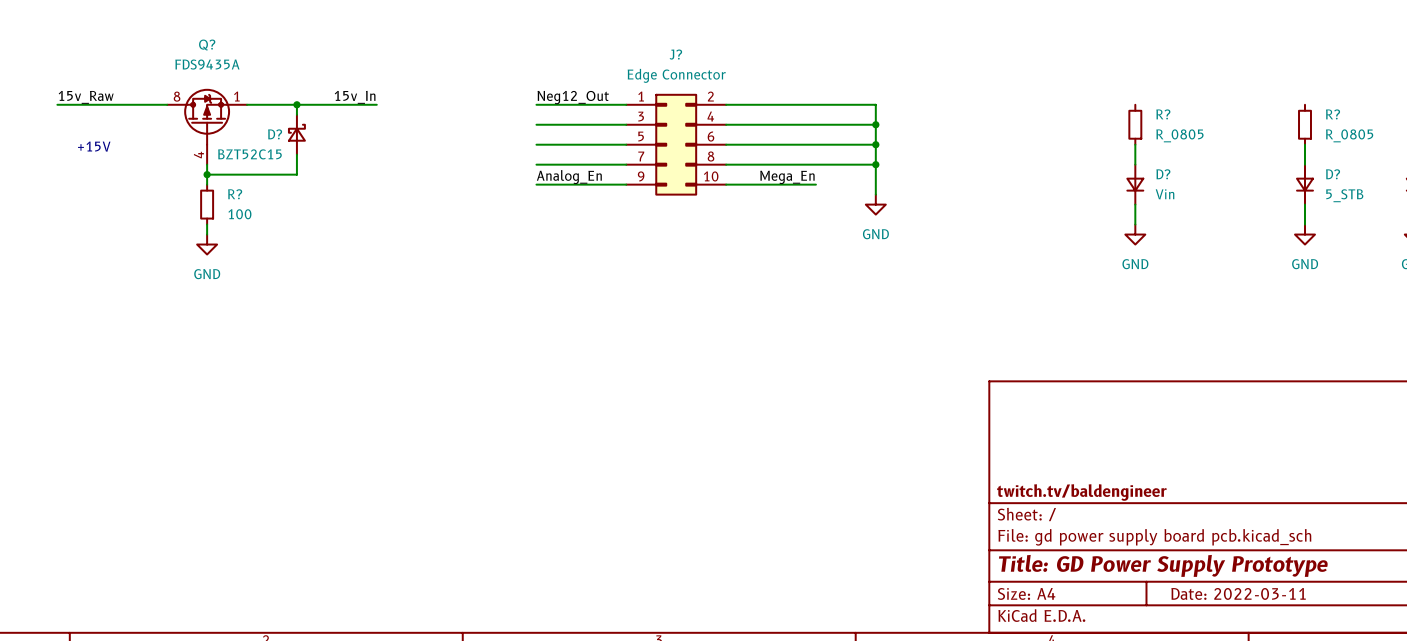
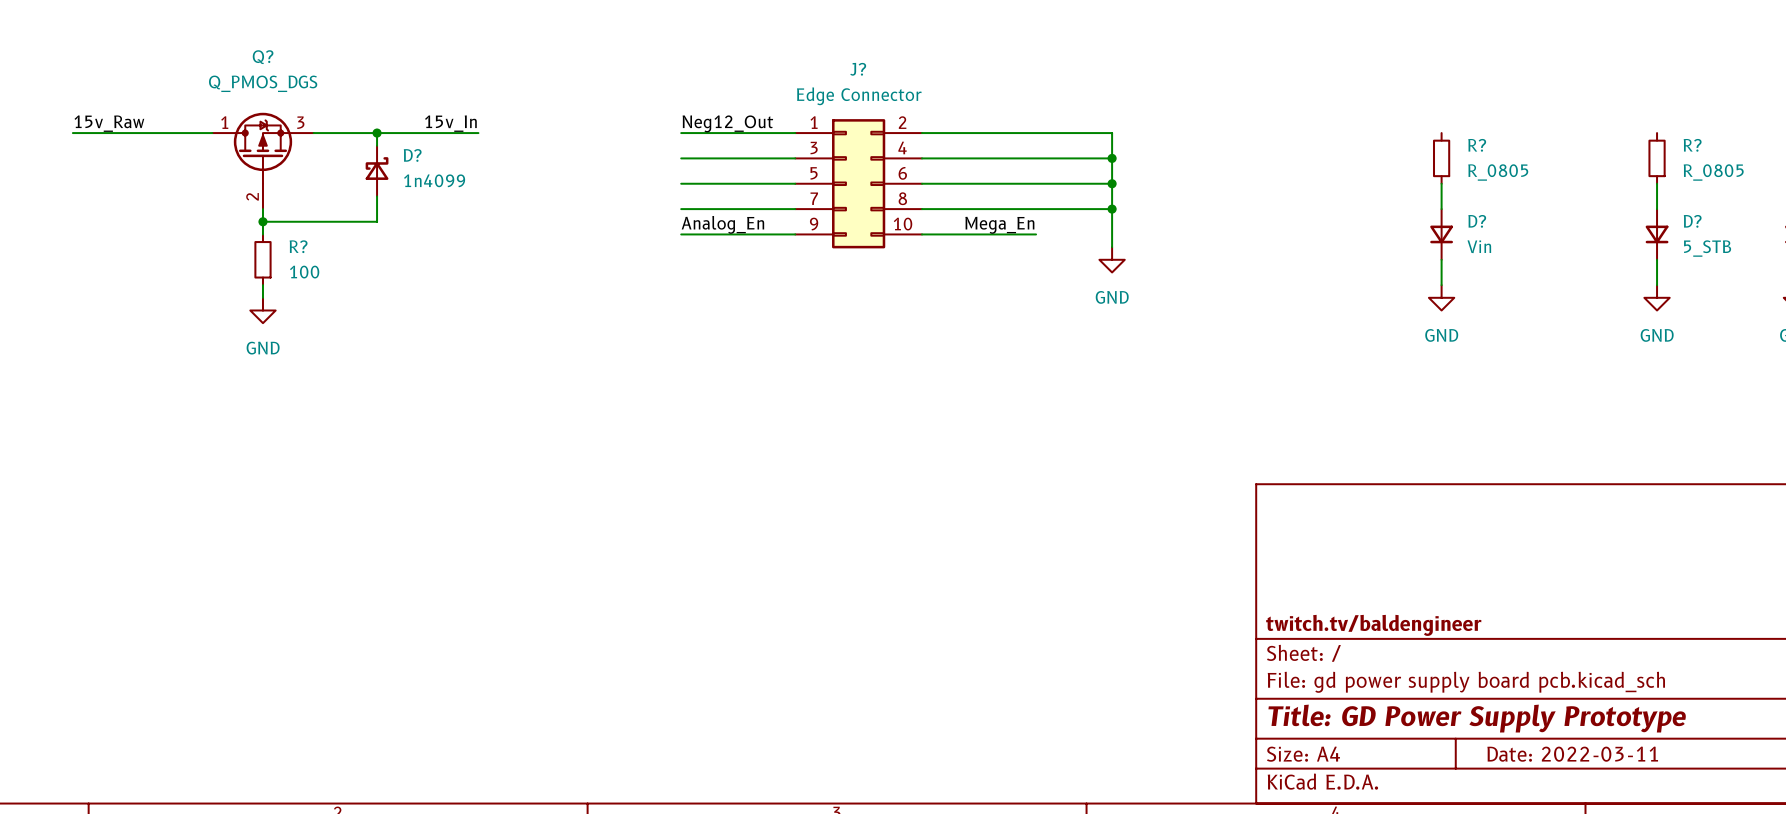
Q? value: FDS9435A (207, 64) -> Q_PMOS_DGS (263, 83)
Q? pin number: 8 (177, 96) -> 1 (224, 122)
Q? pin number: 1 (236, 96) -> 3 (300, 122)
D? name position: D? (275, 134) -> D? (412, 155)
text: +15V (94, 146) -> none
D? value: BZT52C15 (249, 154) -> 1n4099 (434, 180)
Q? pin number: 4 (198, 155) -> 2 (252, 196)

